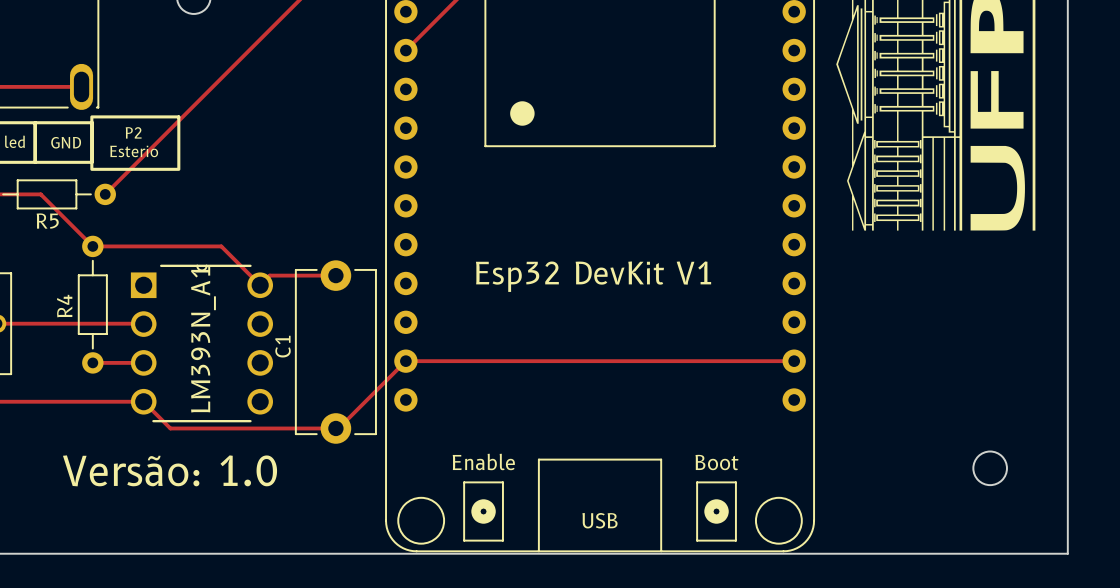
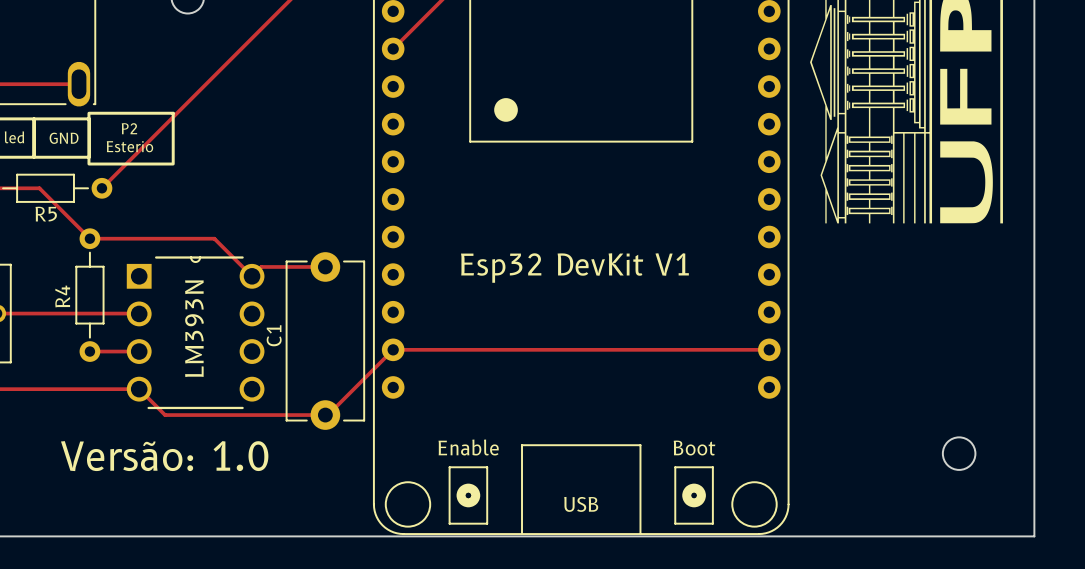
LM393N_A1 name: LM393N_A1 (203, 339) -> LM393N (194, 328)

